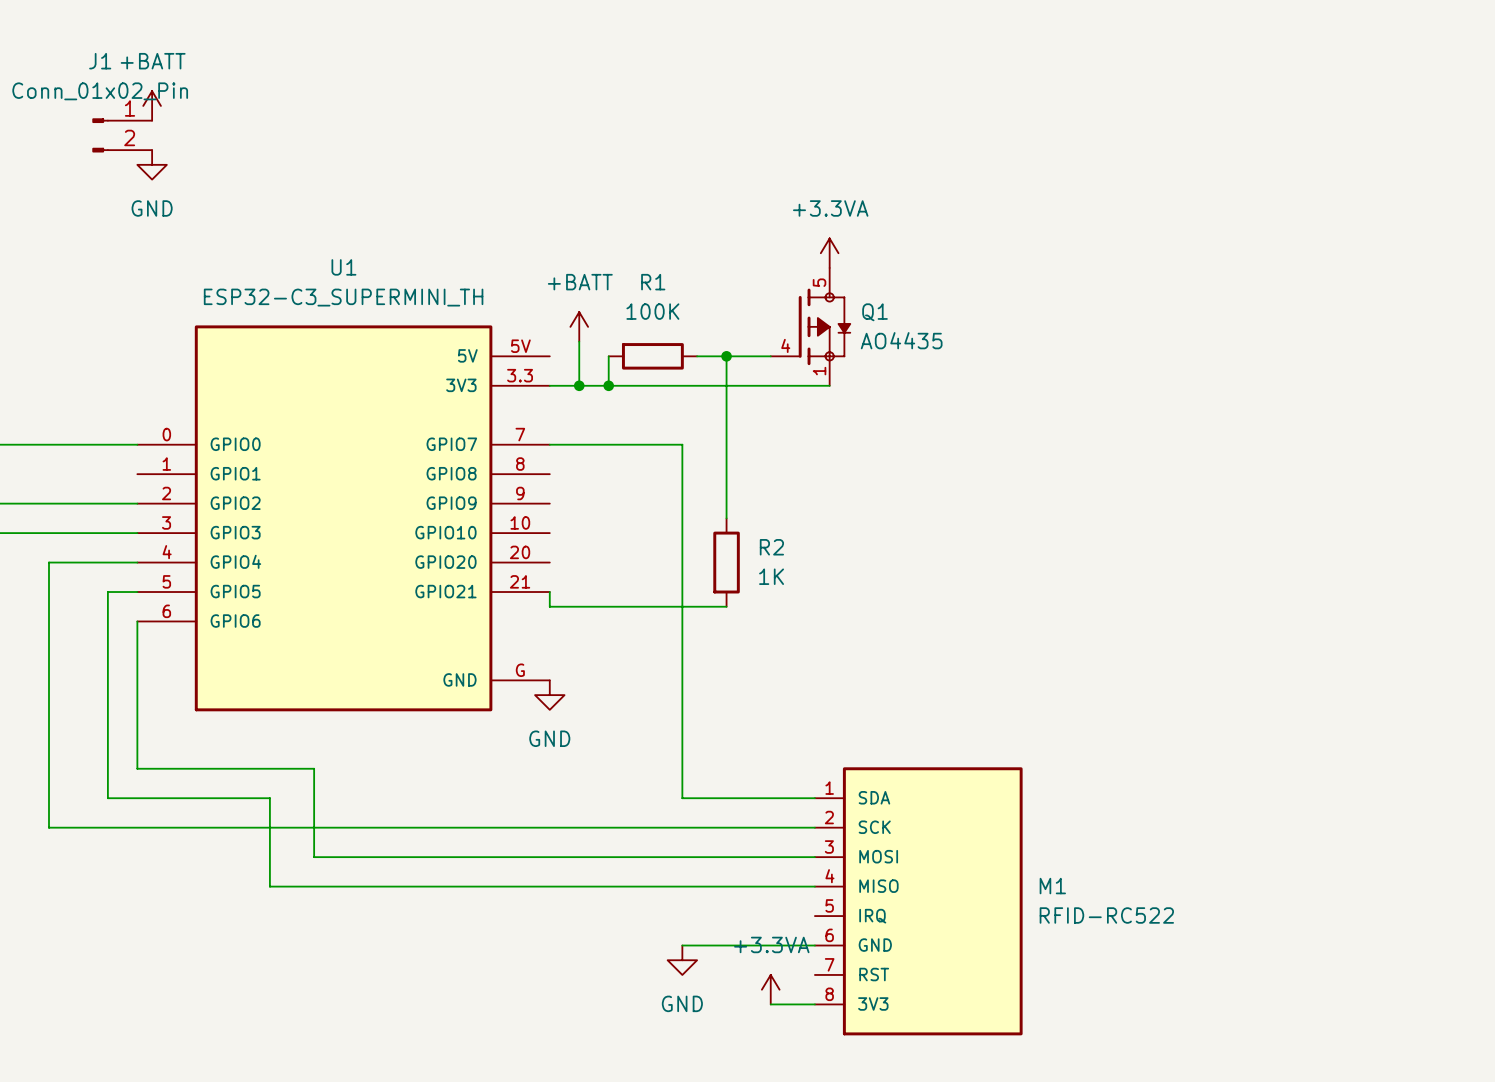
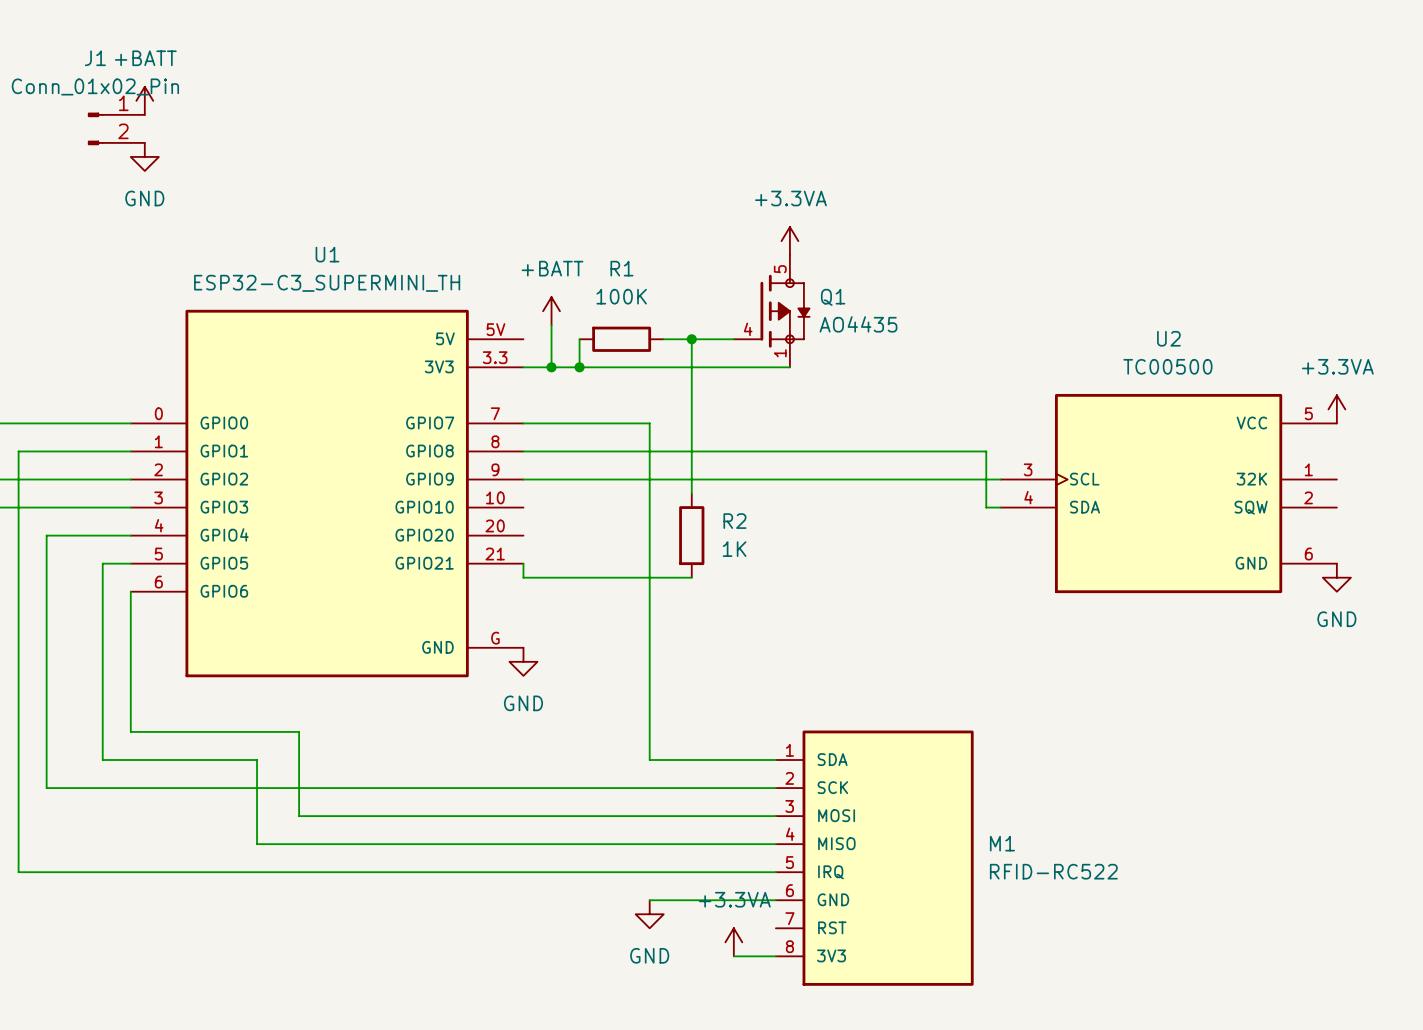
power symbol: none -> +3.3VA (1336, 409)
wire: none -> (130, 451) (18, 451) (18, 872) (775, 872)
wire: none -> (523, 451) (986, 451) (986, 507) (1000, 507)
wire: none -> (523, 479) (1000, 479)
U2: none -> TC00500 (1168, 493)
power symbol: none -> GND (1336, 577)

